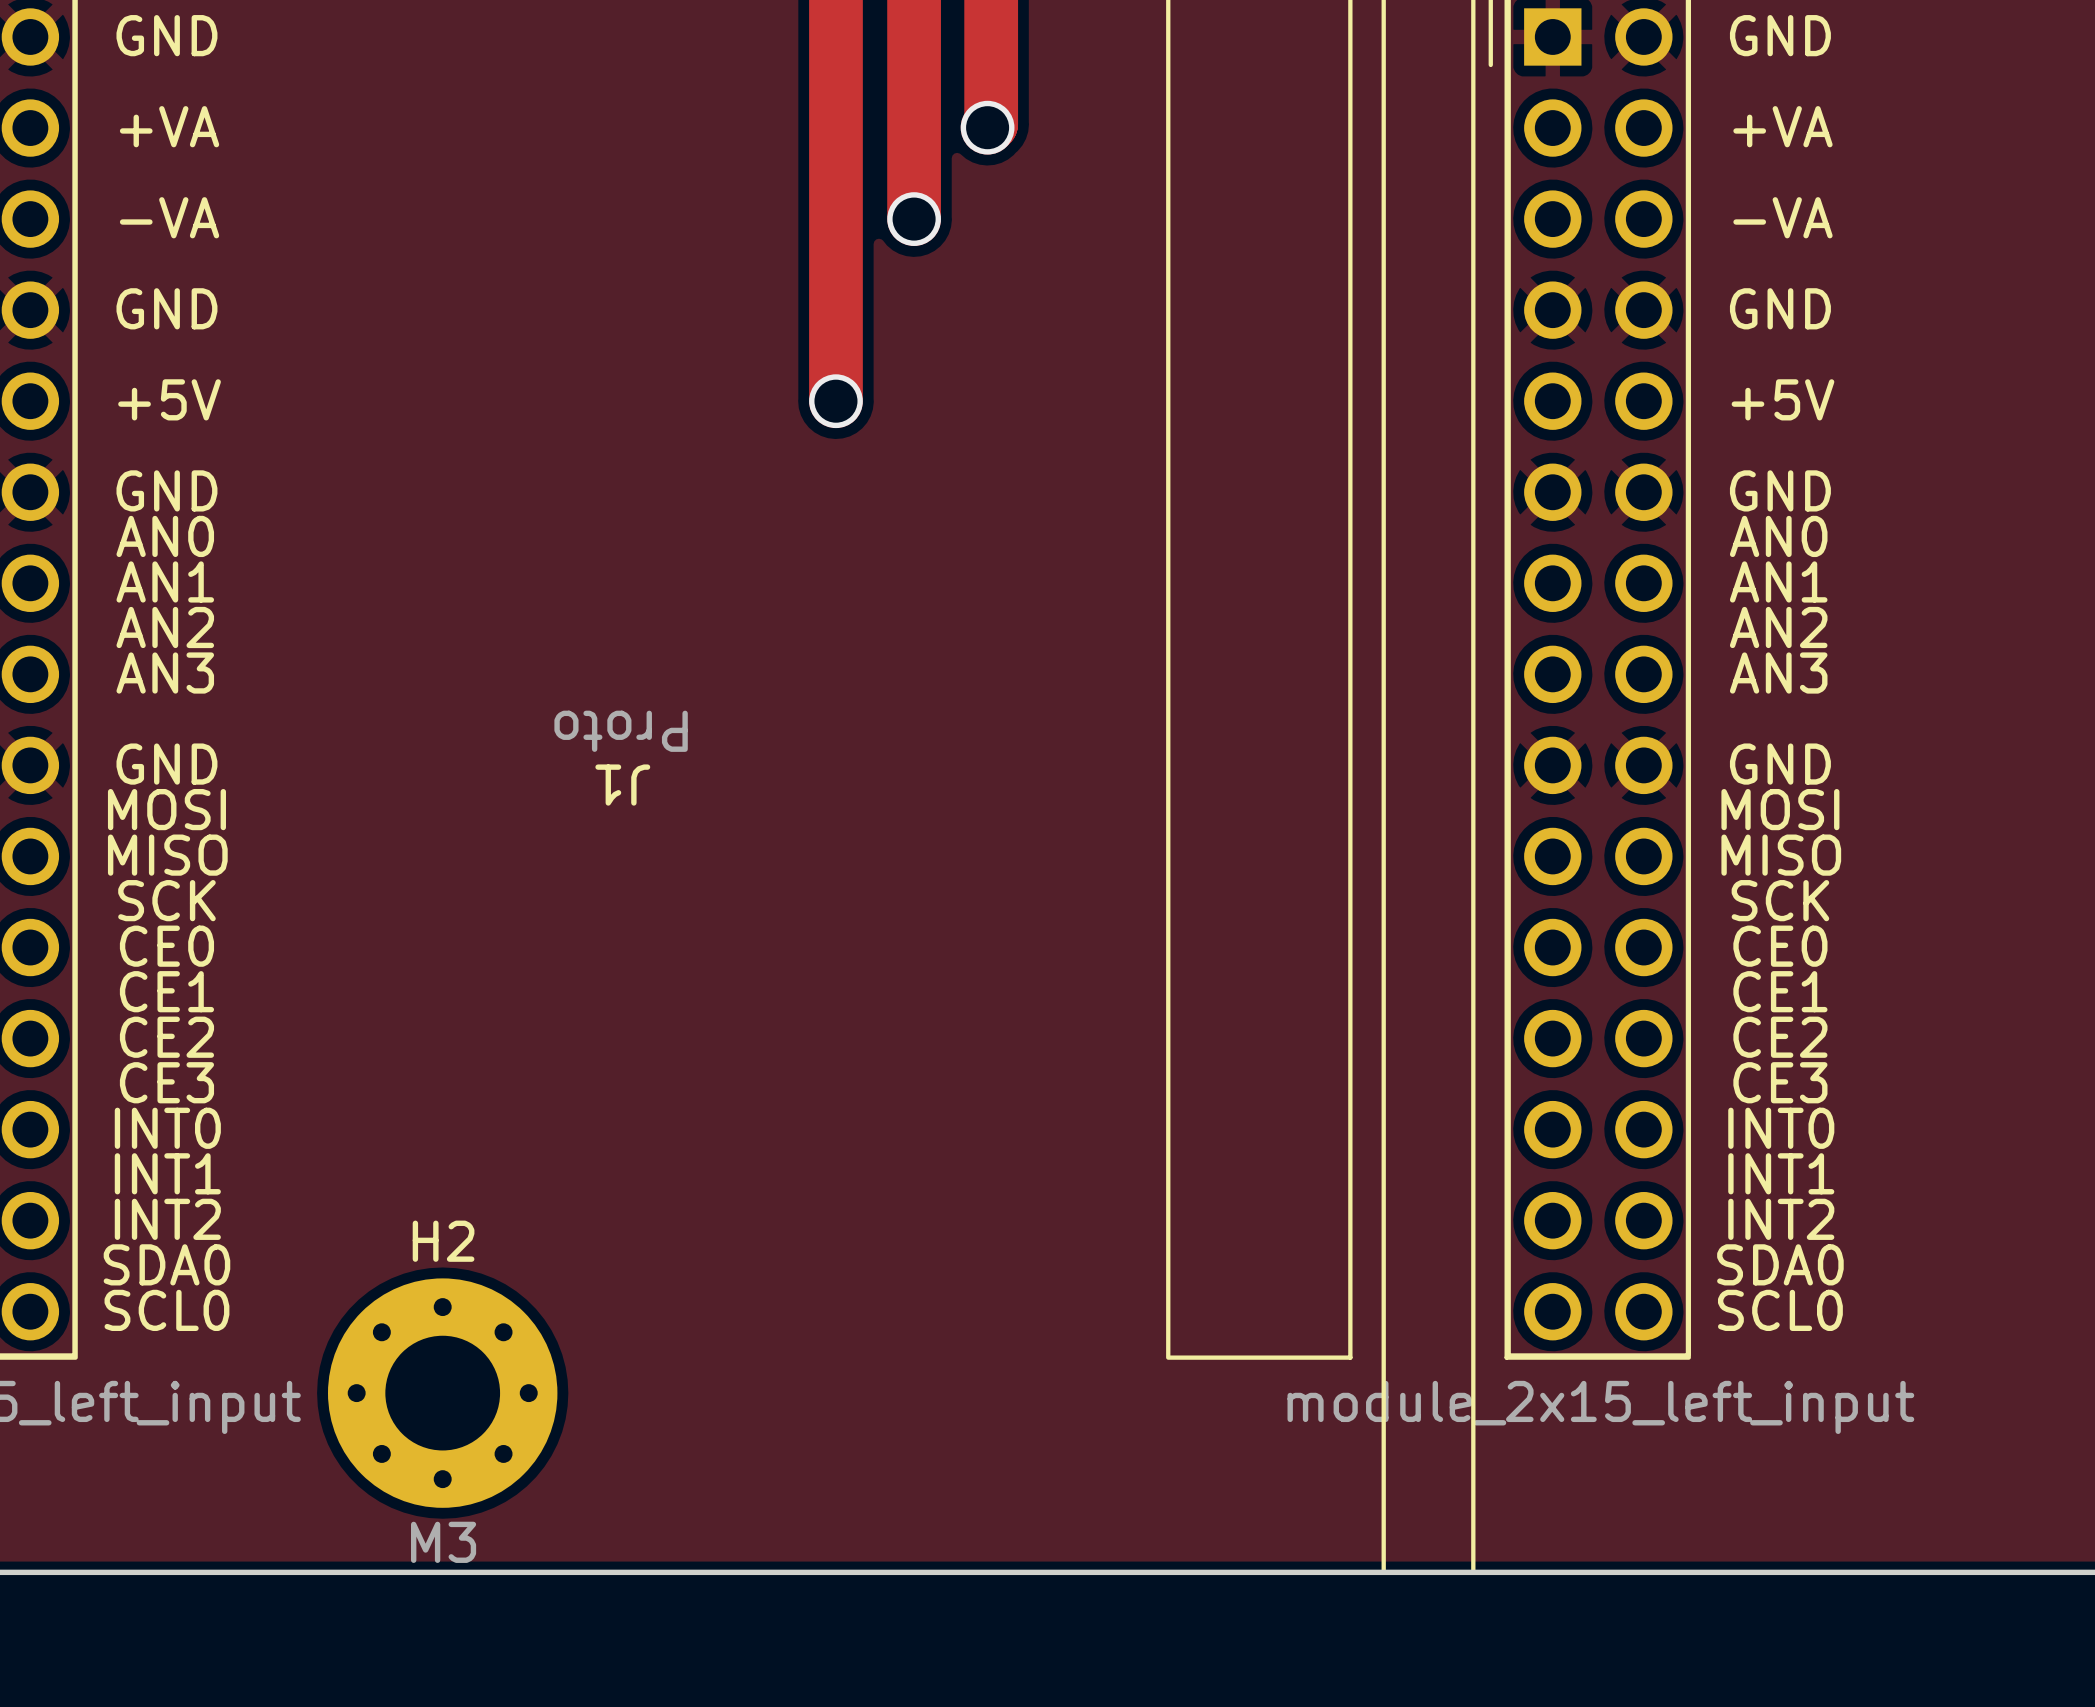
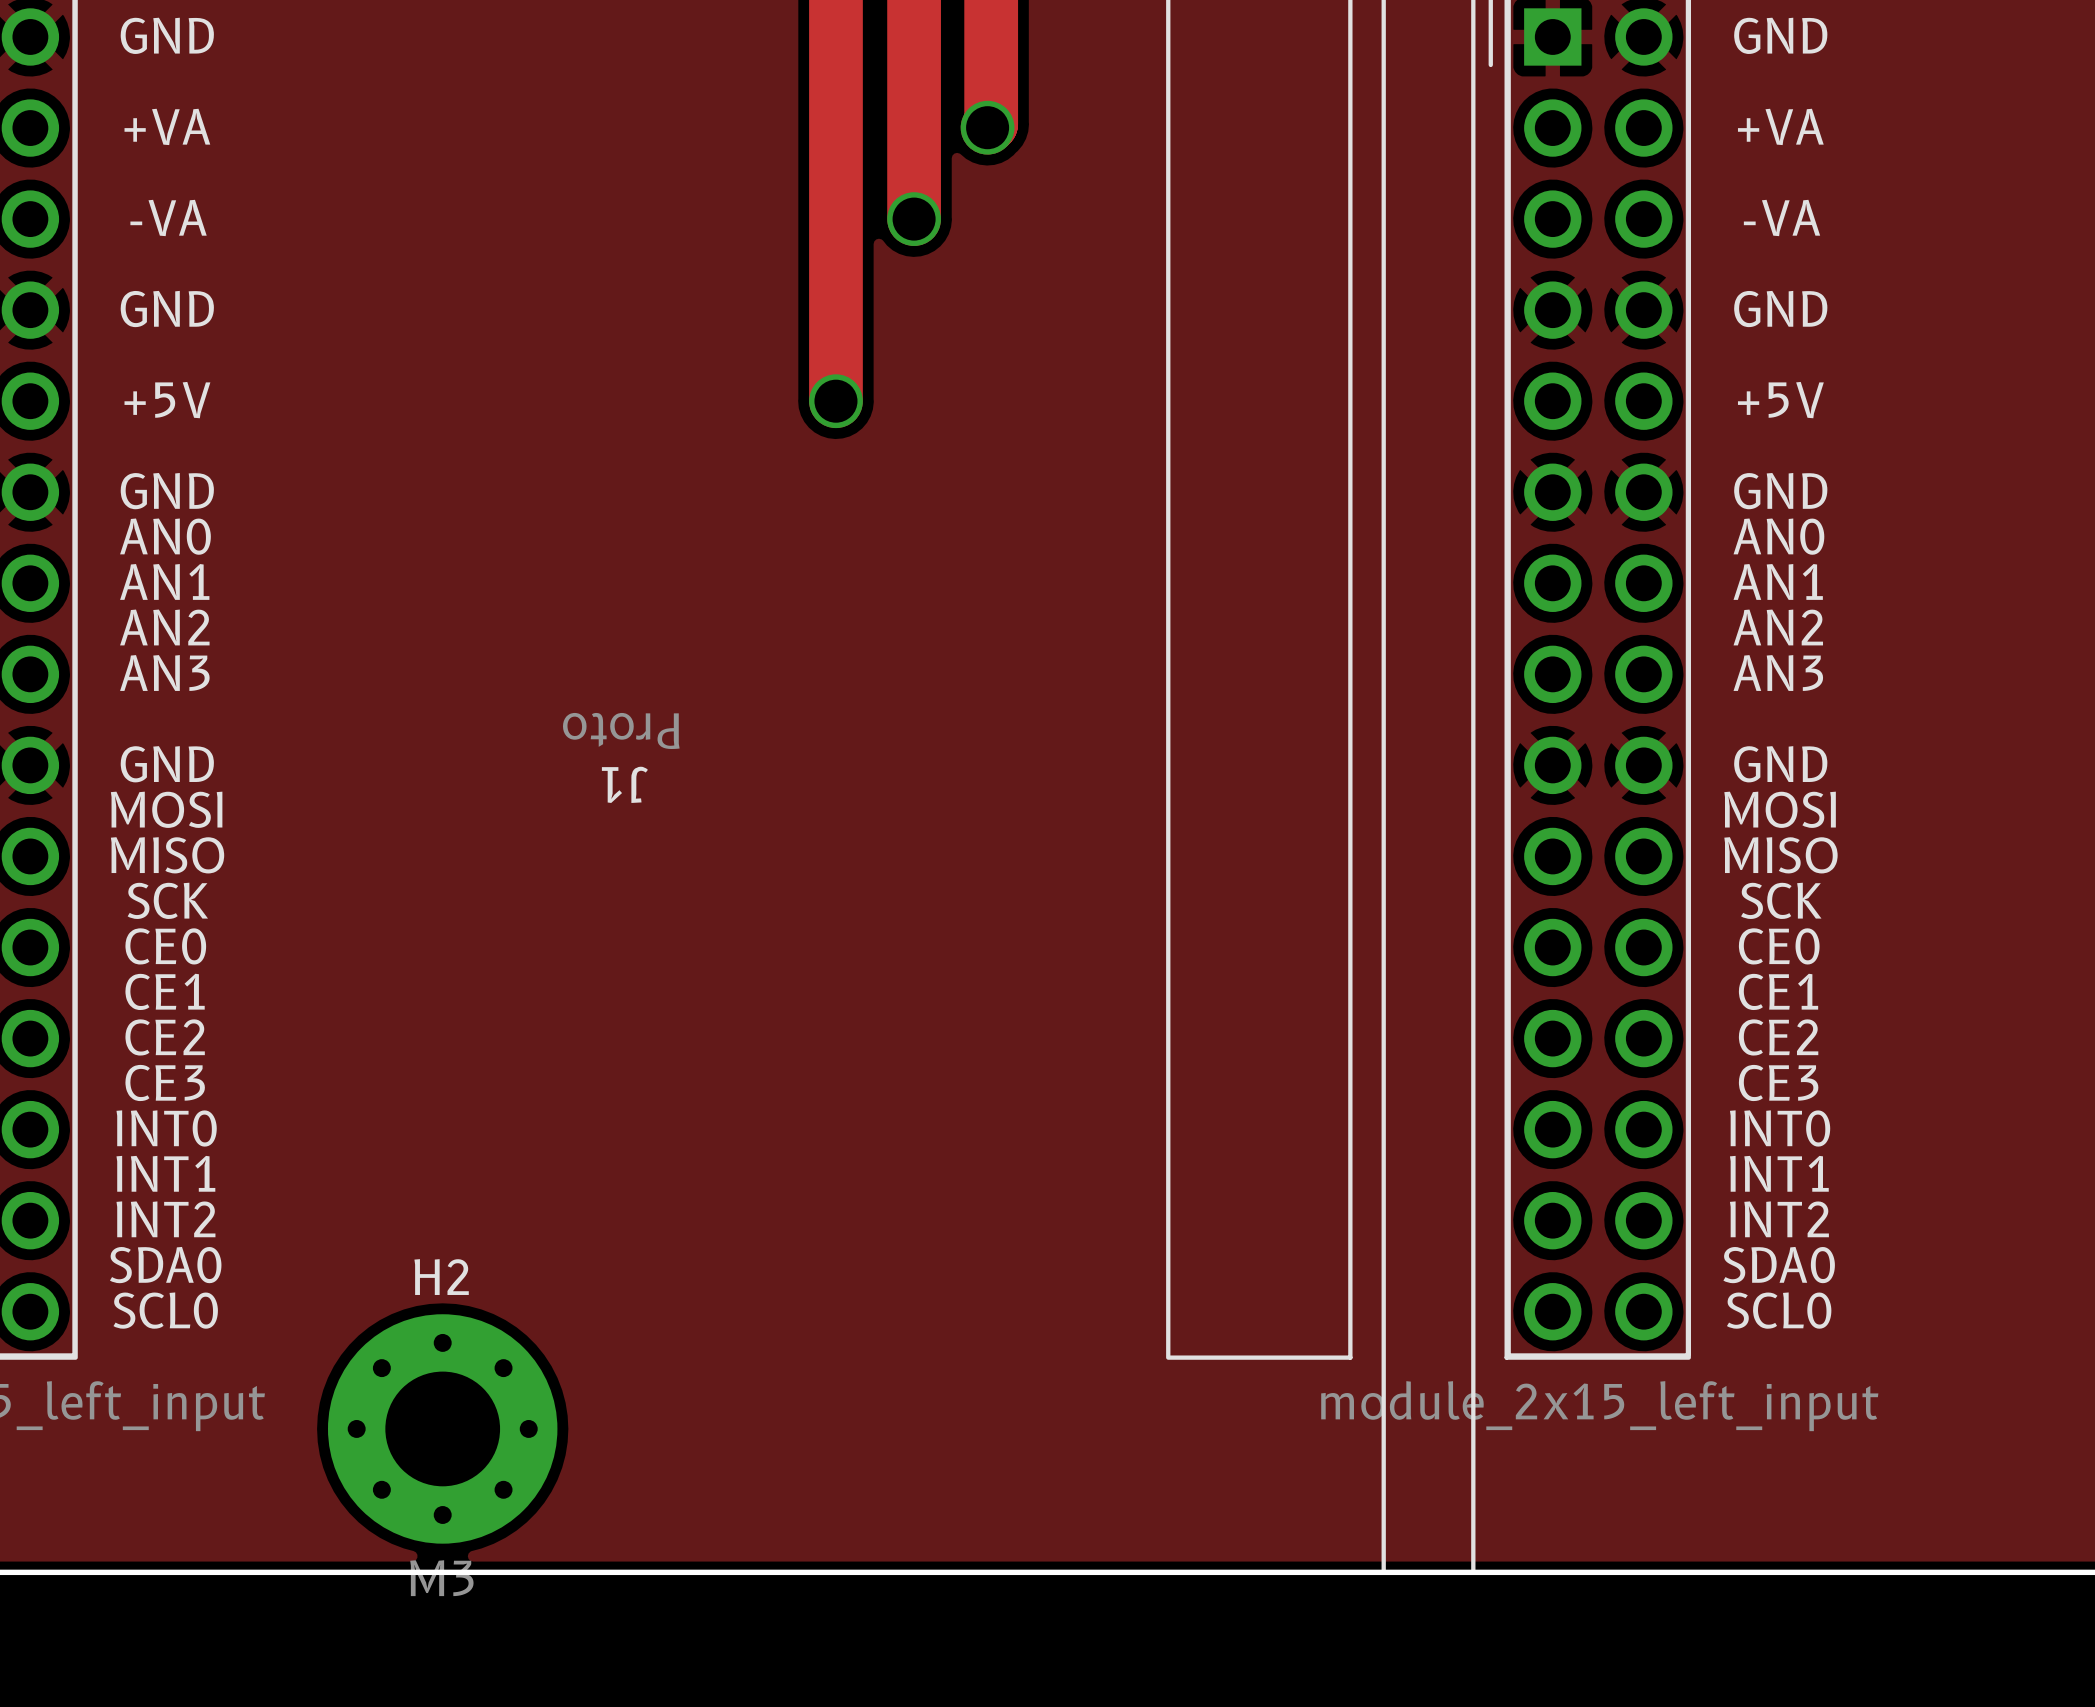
H2 position: (442, 1393) -> (442, 1428)

